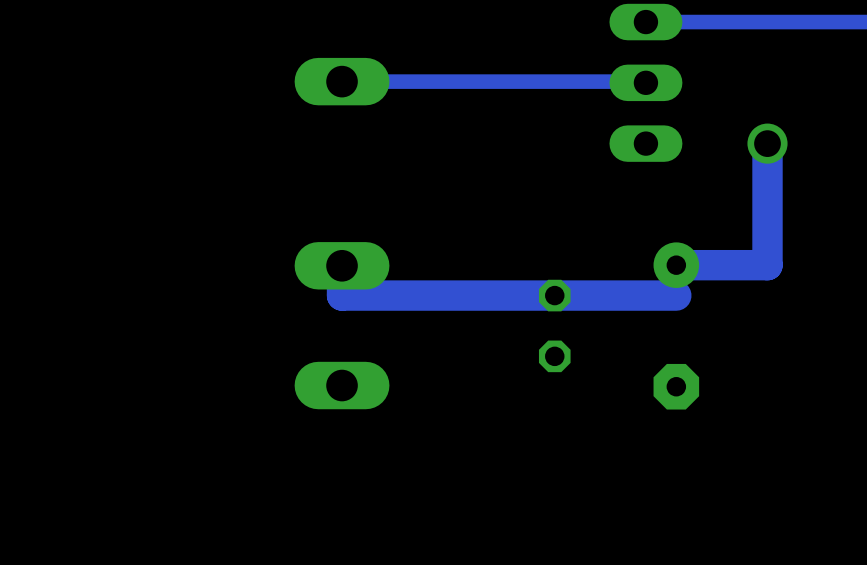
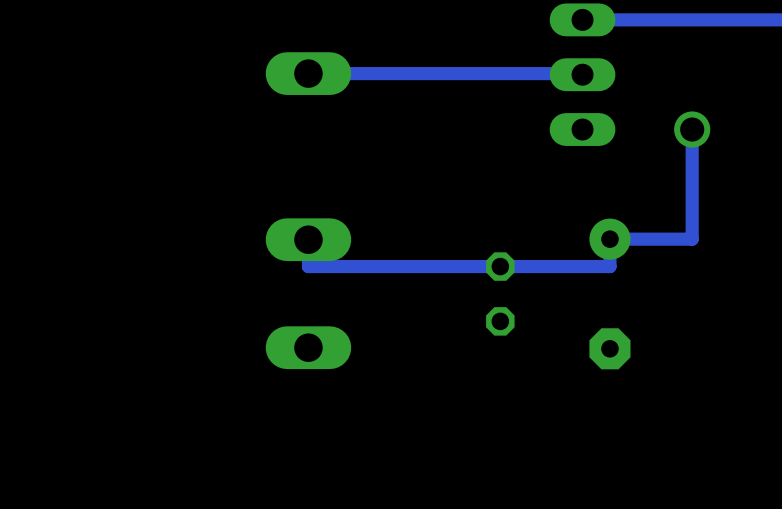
track width: thick (767, 143) (767, 265) (676, 265) -> thin (692, 129) (692, 239) (609, 239)
track width: thick (342, 265) (342, 295) (676, 295) -> thin (308, 239) (308, 266) (609, 266)

